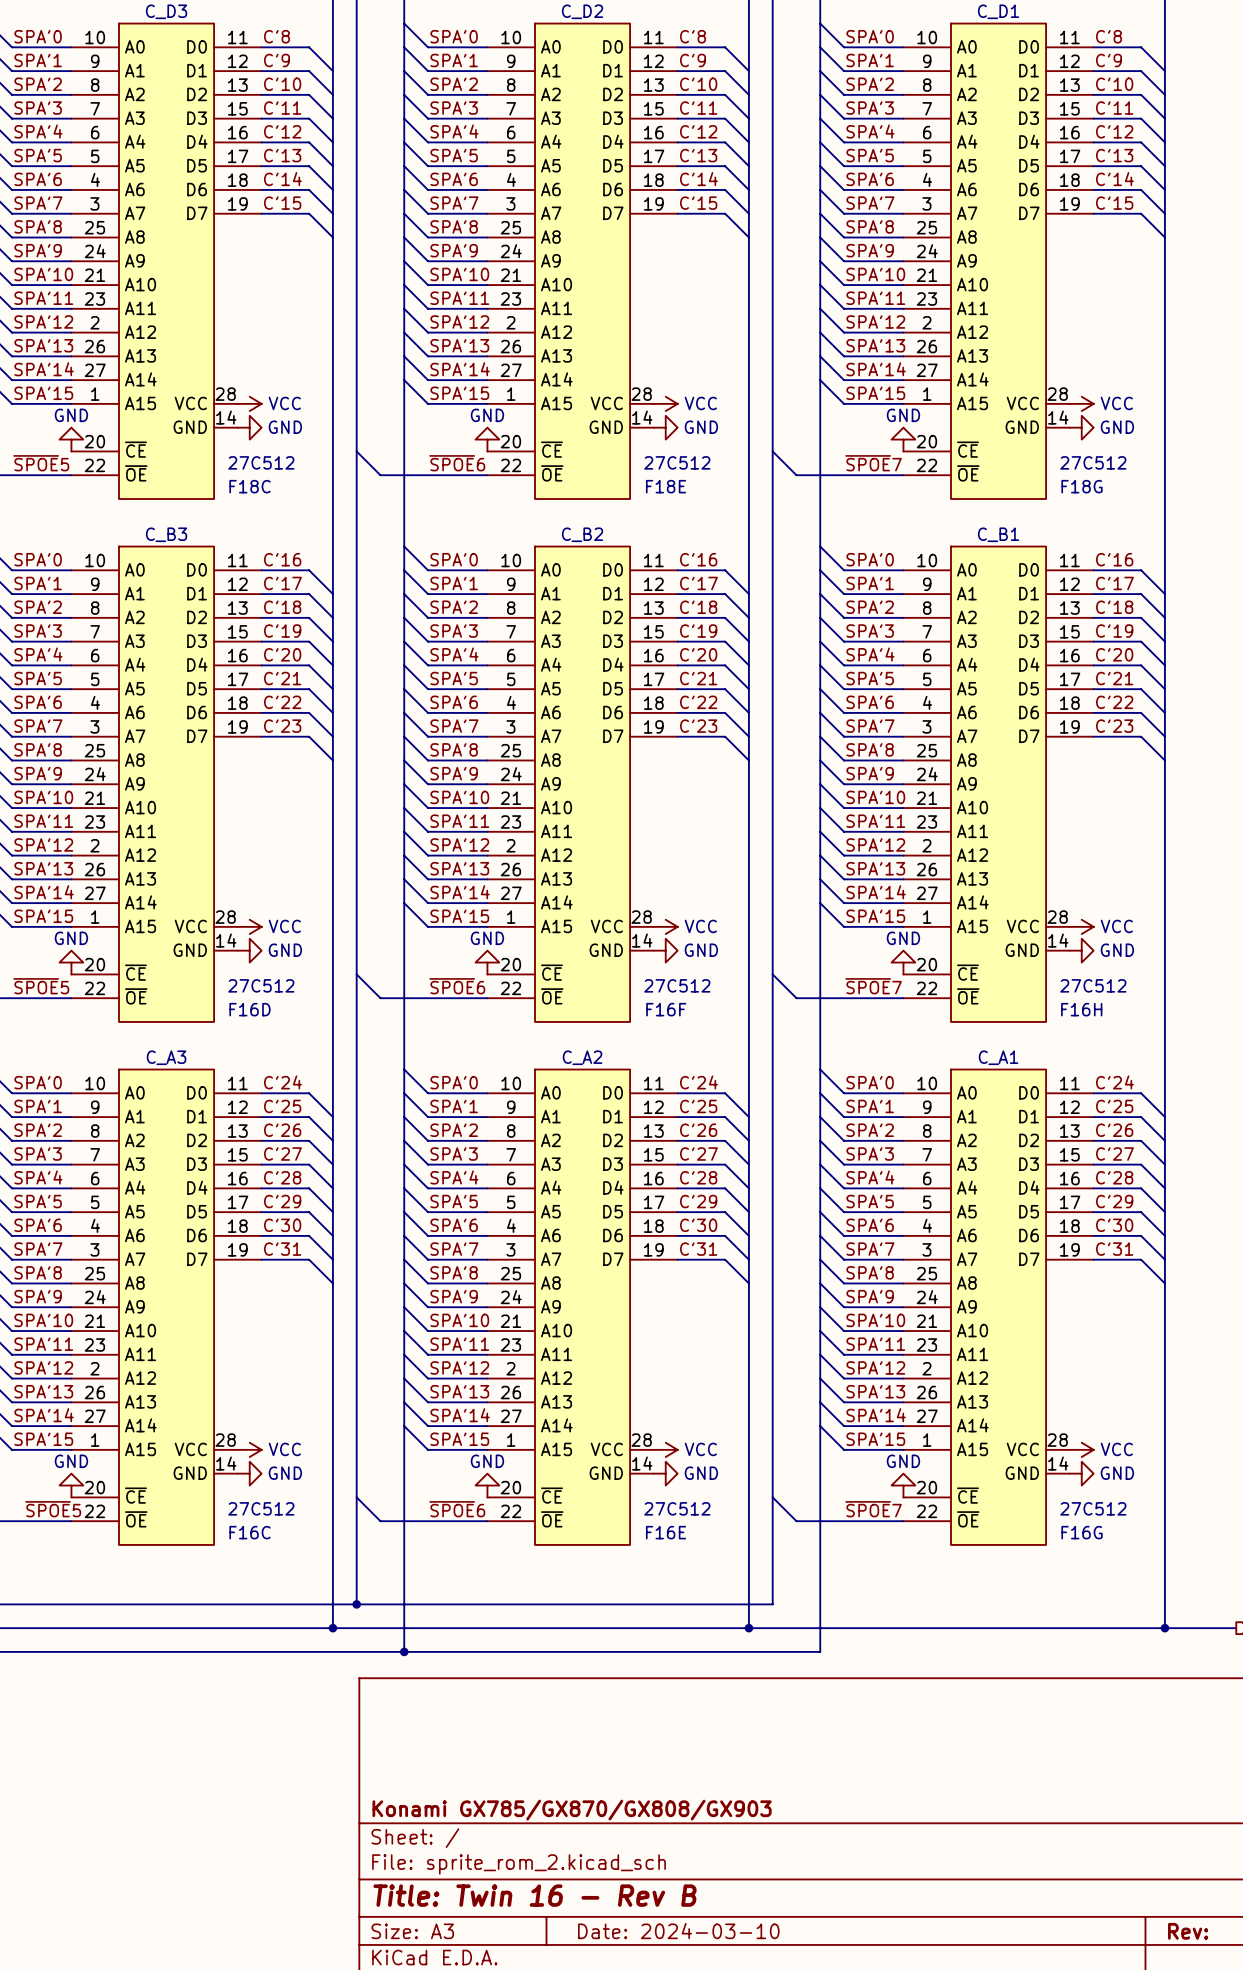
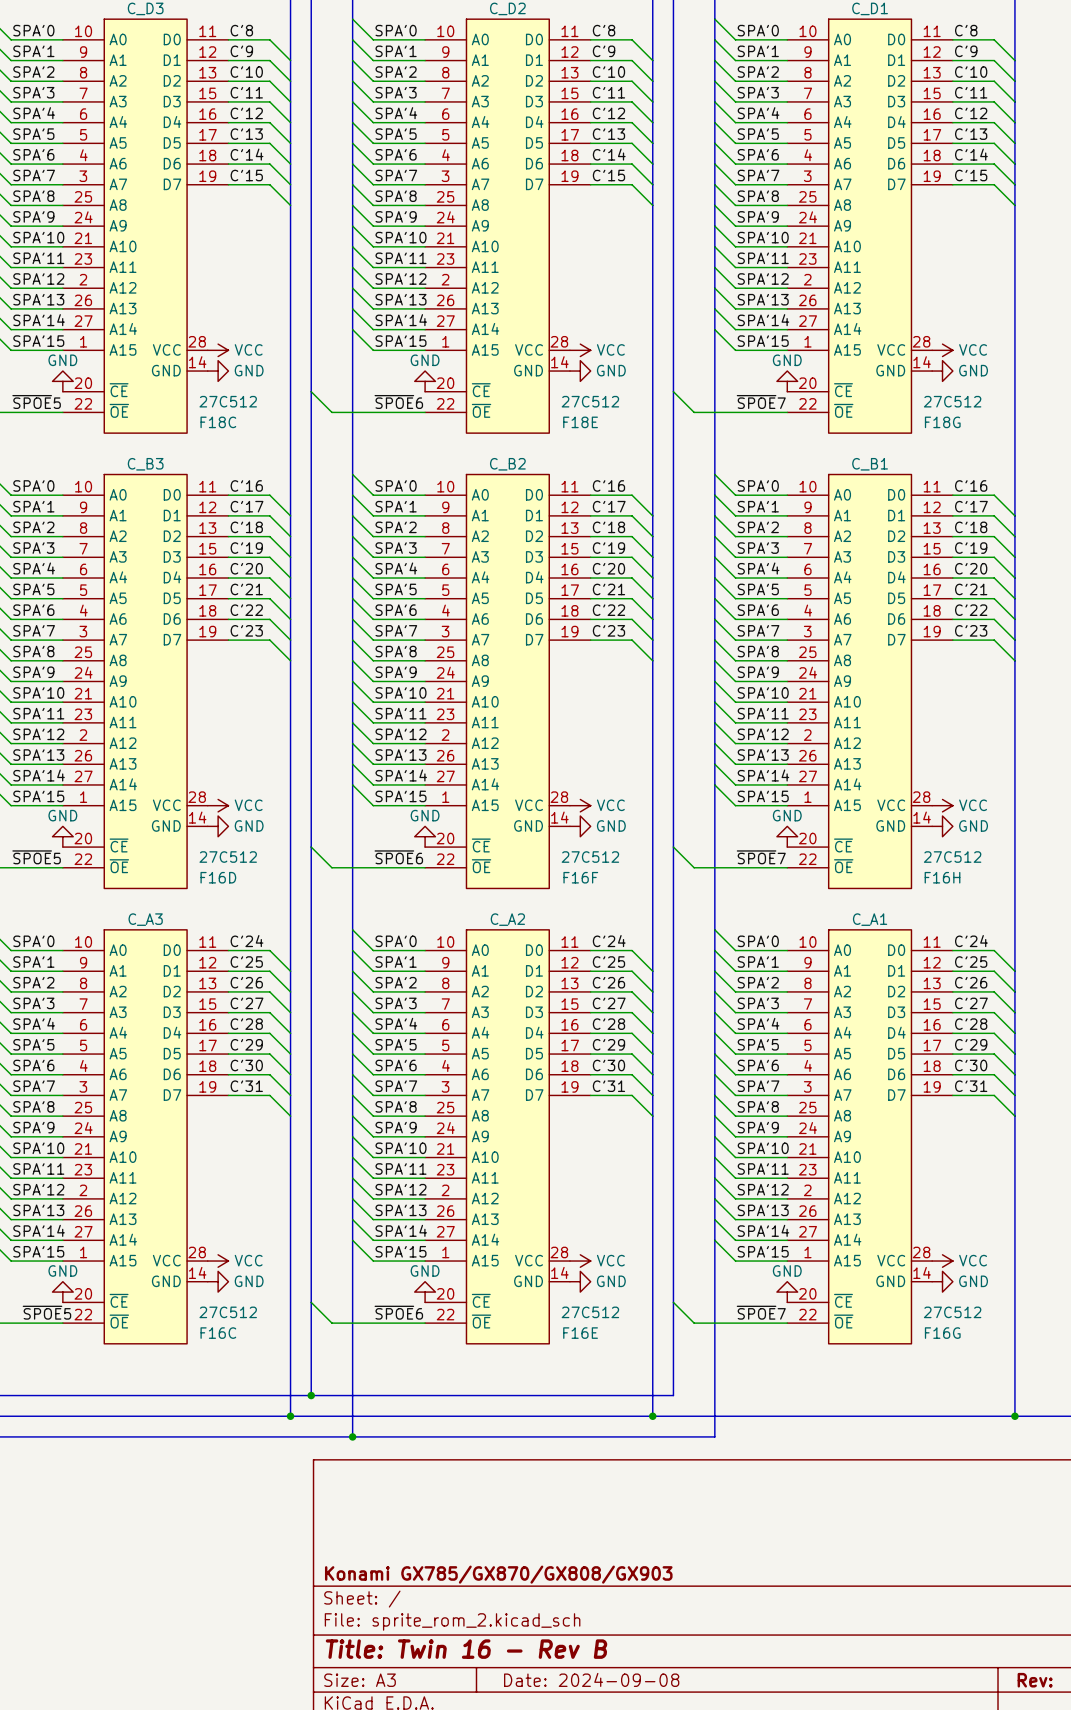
title block: Date: 2024-03-10 (678, 1931) -> Date: 2024-09-08 (591, 1679)

